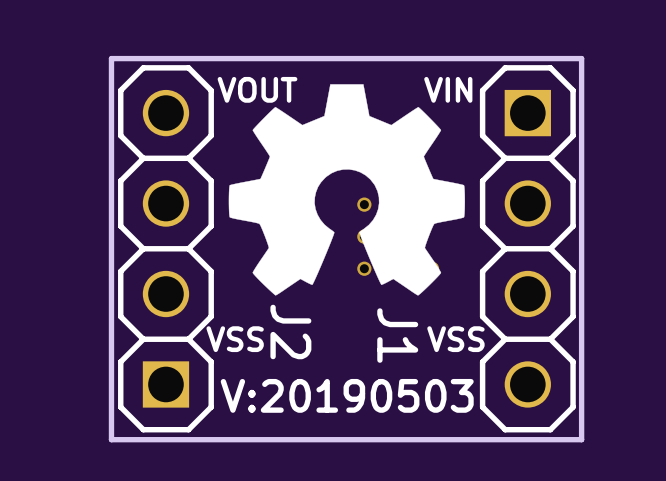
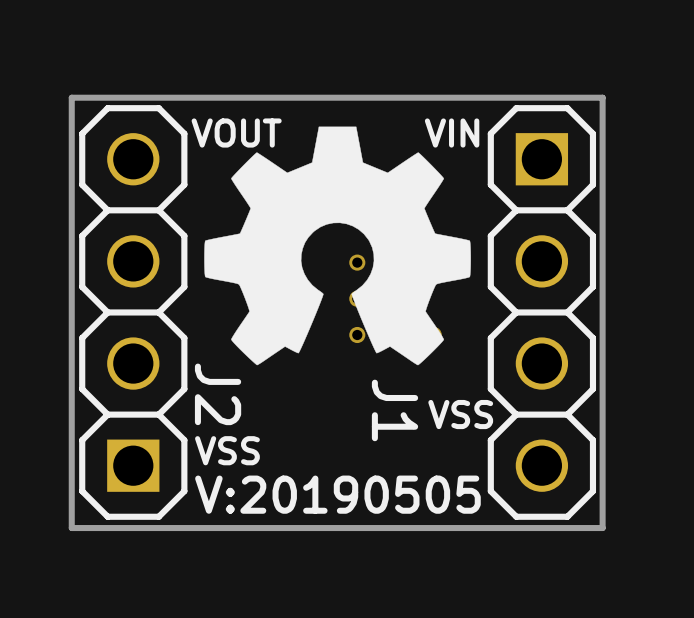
J2 name position: J2 (290, 331) -> J2 (218, 394)
J2 text position: VSS (235, 339) -> VSS (227, 450)
drawing shape: [220, 378, 474, 413] -> [195, 475, 481, 514]

